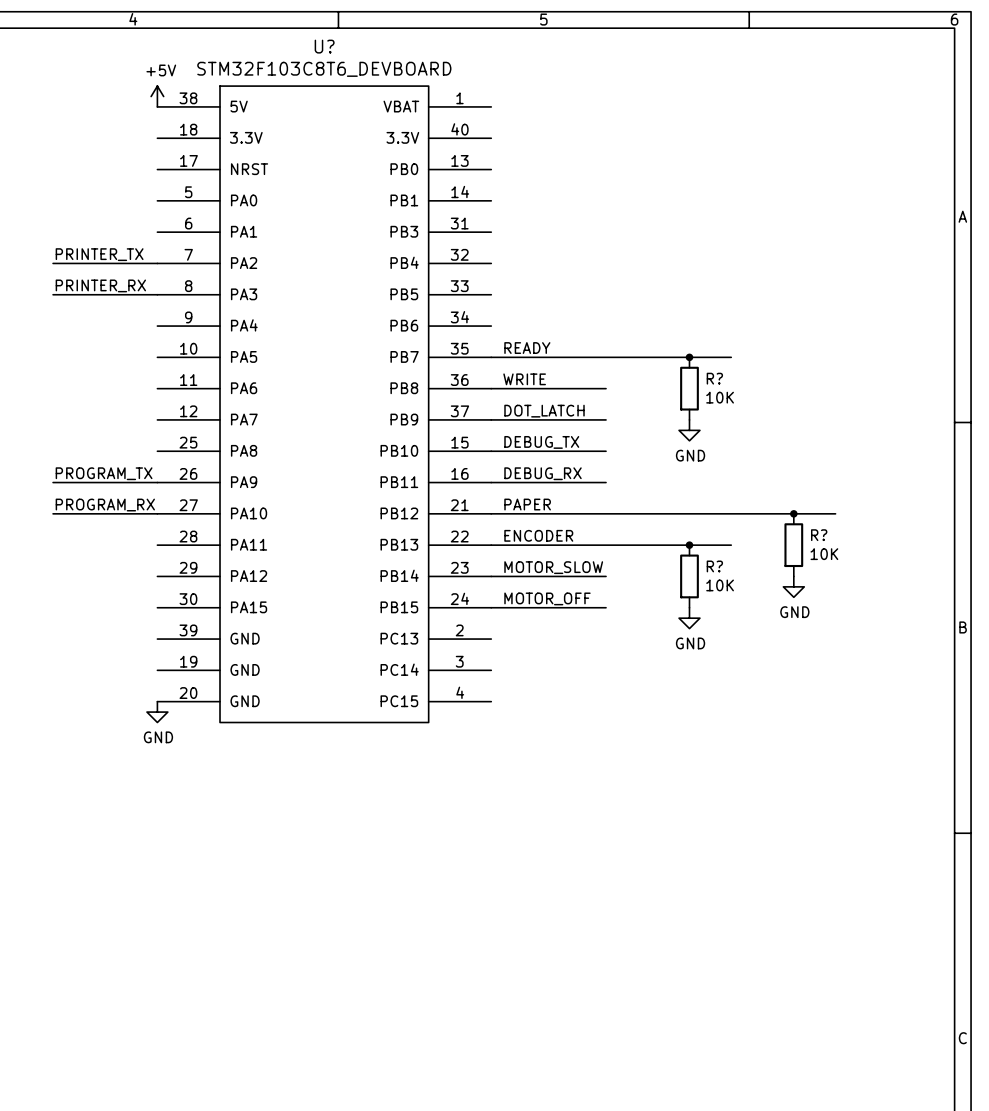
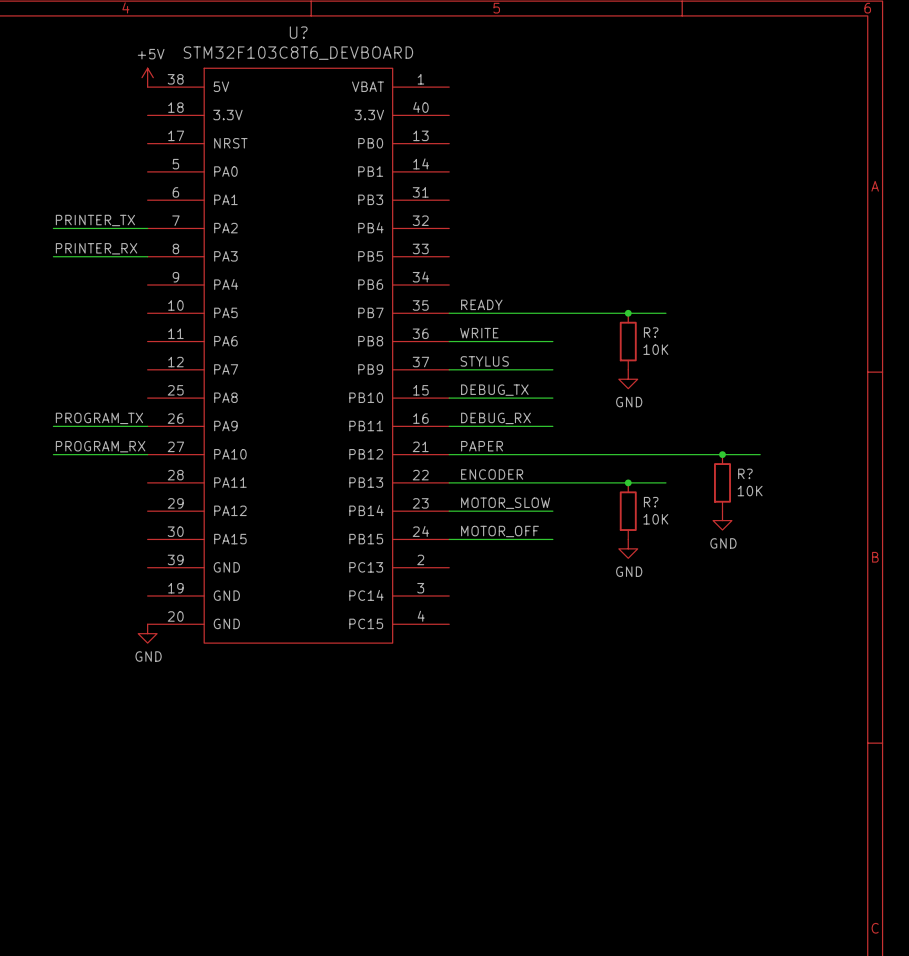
label: DOT_LATCH (544, 411) -> STYLUS (484, 361)

